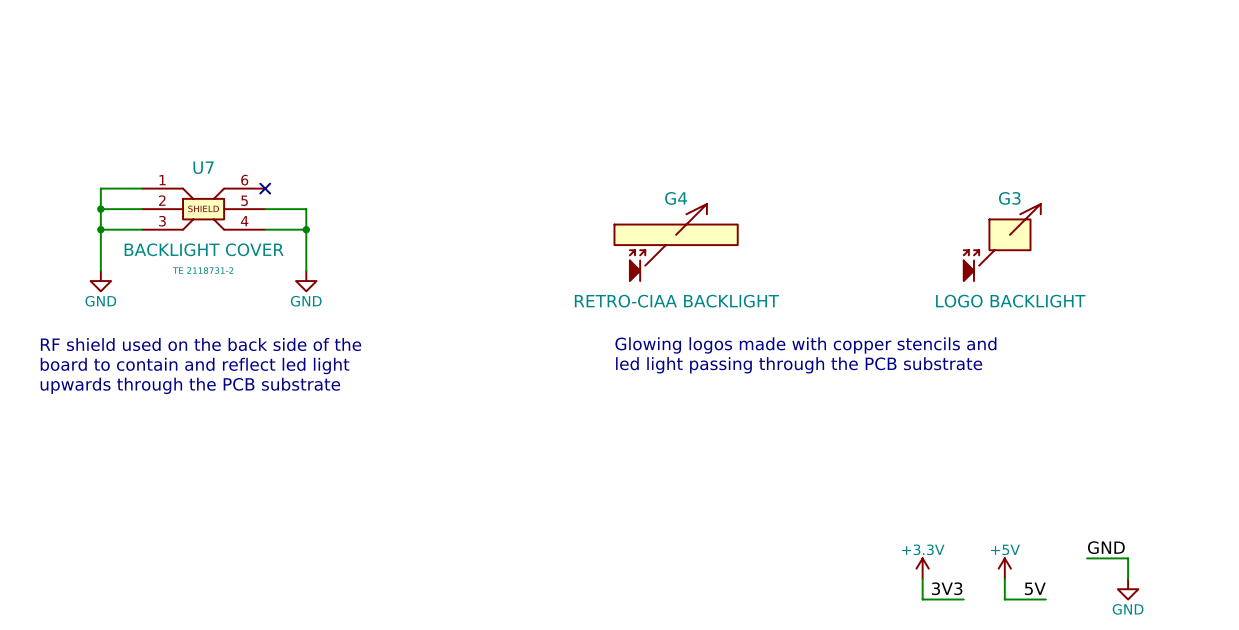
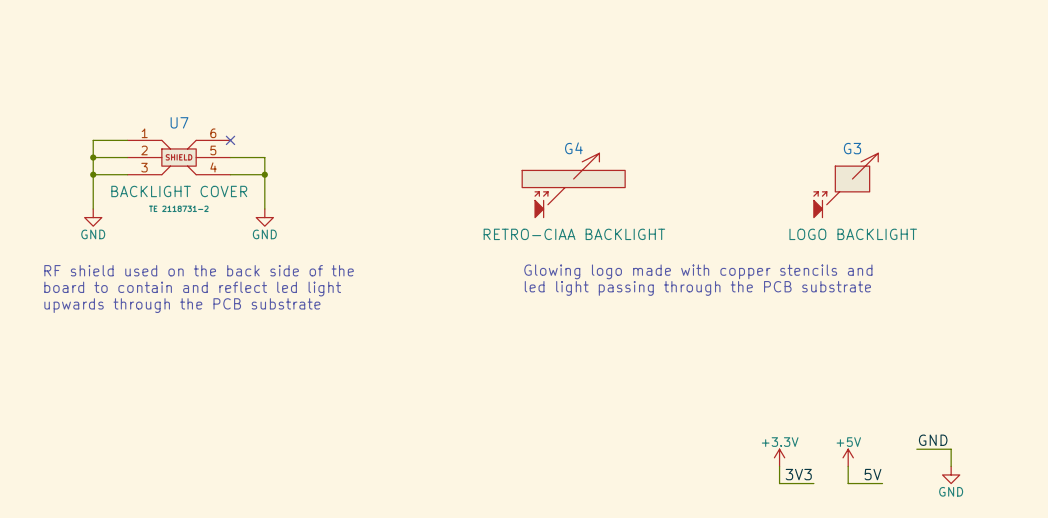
text: Glowing logos made with copper stencils and (805, 345) -> Glowing logo made with copper stencils and (698, 271)

